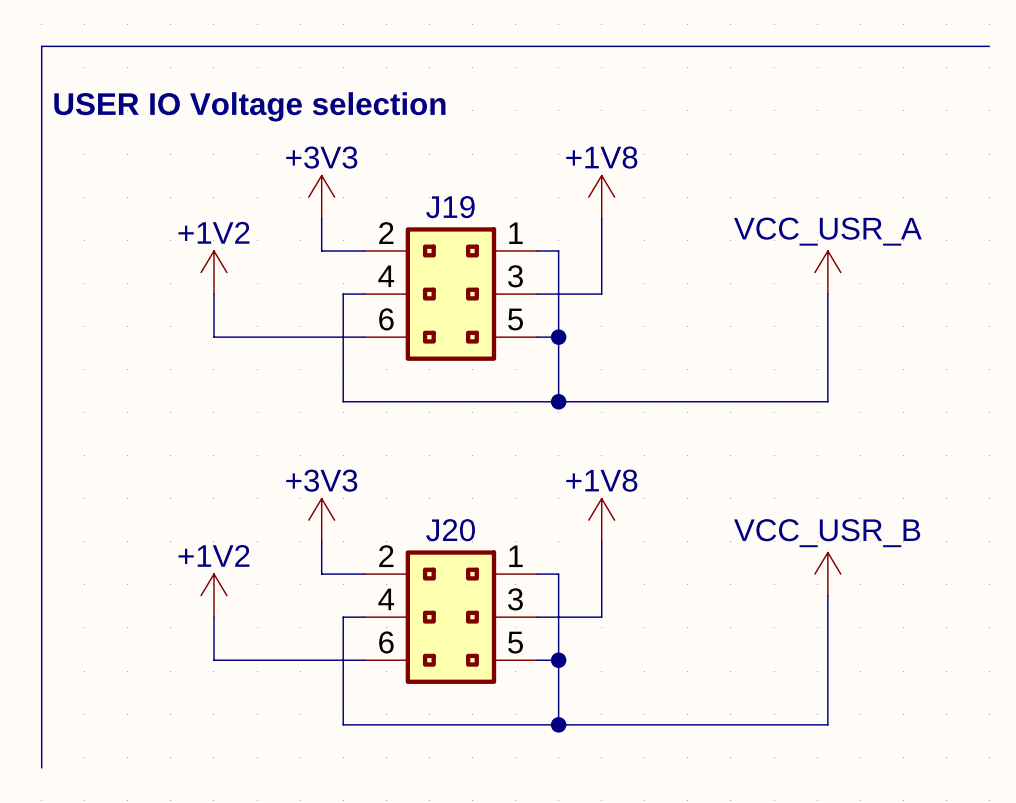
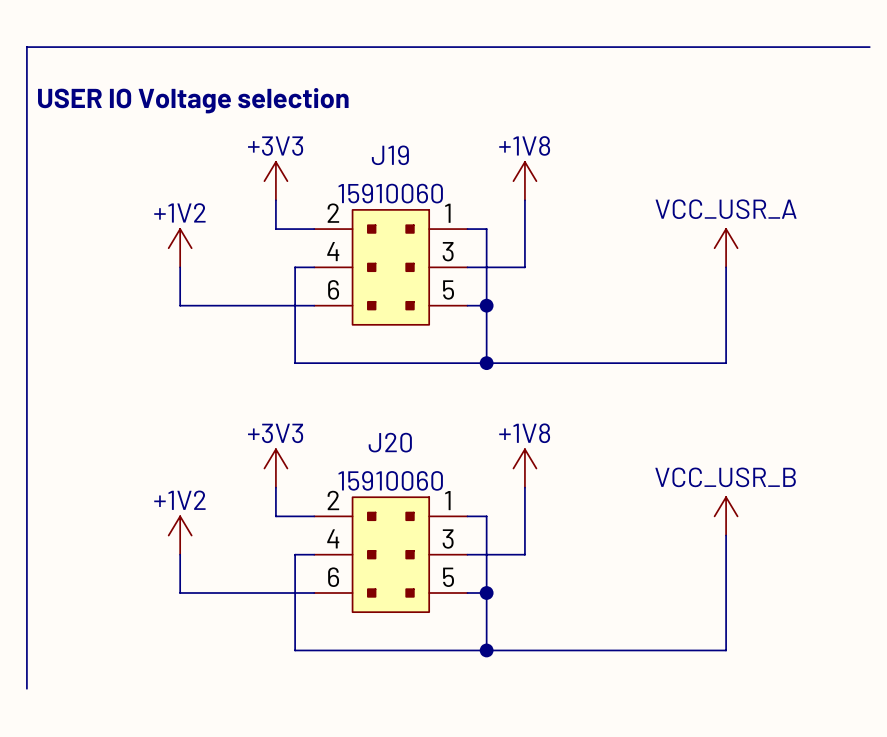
J19 name position: J19 (450, 207) -> J19 (390, 155)
J19 value: none -> 15910060 (390, 193)
J19 symbol: [364, 227, 538, 361] -> [314, 209, 468, 325]
J20 name position: J20 (450, 530) -> J20 (390, 442)
J20 value: none -> 15910060 (390, 480)
J20 symbol: [364, 550, 538, 684] -> [314, 497, 468, 613]

